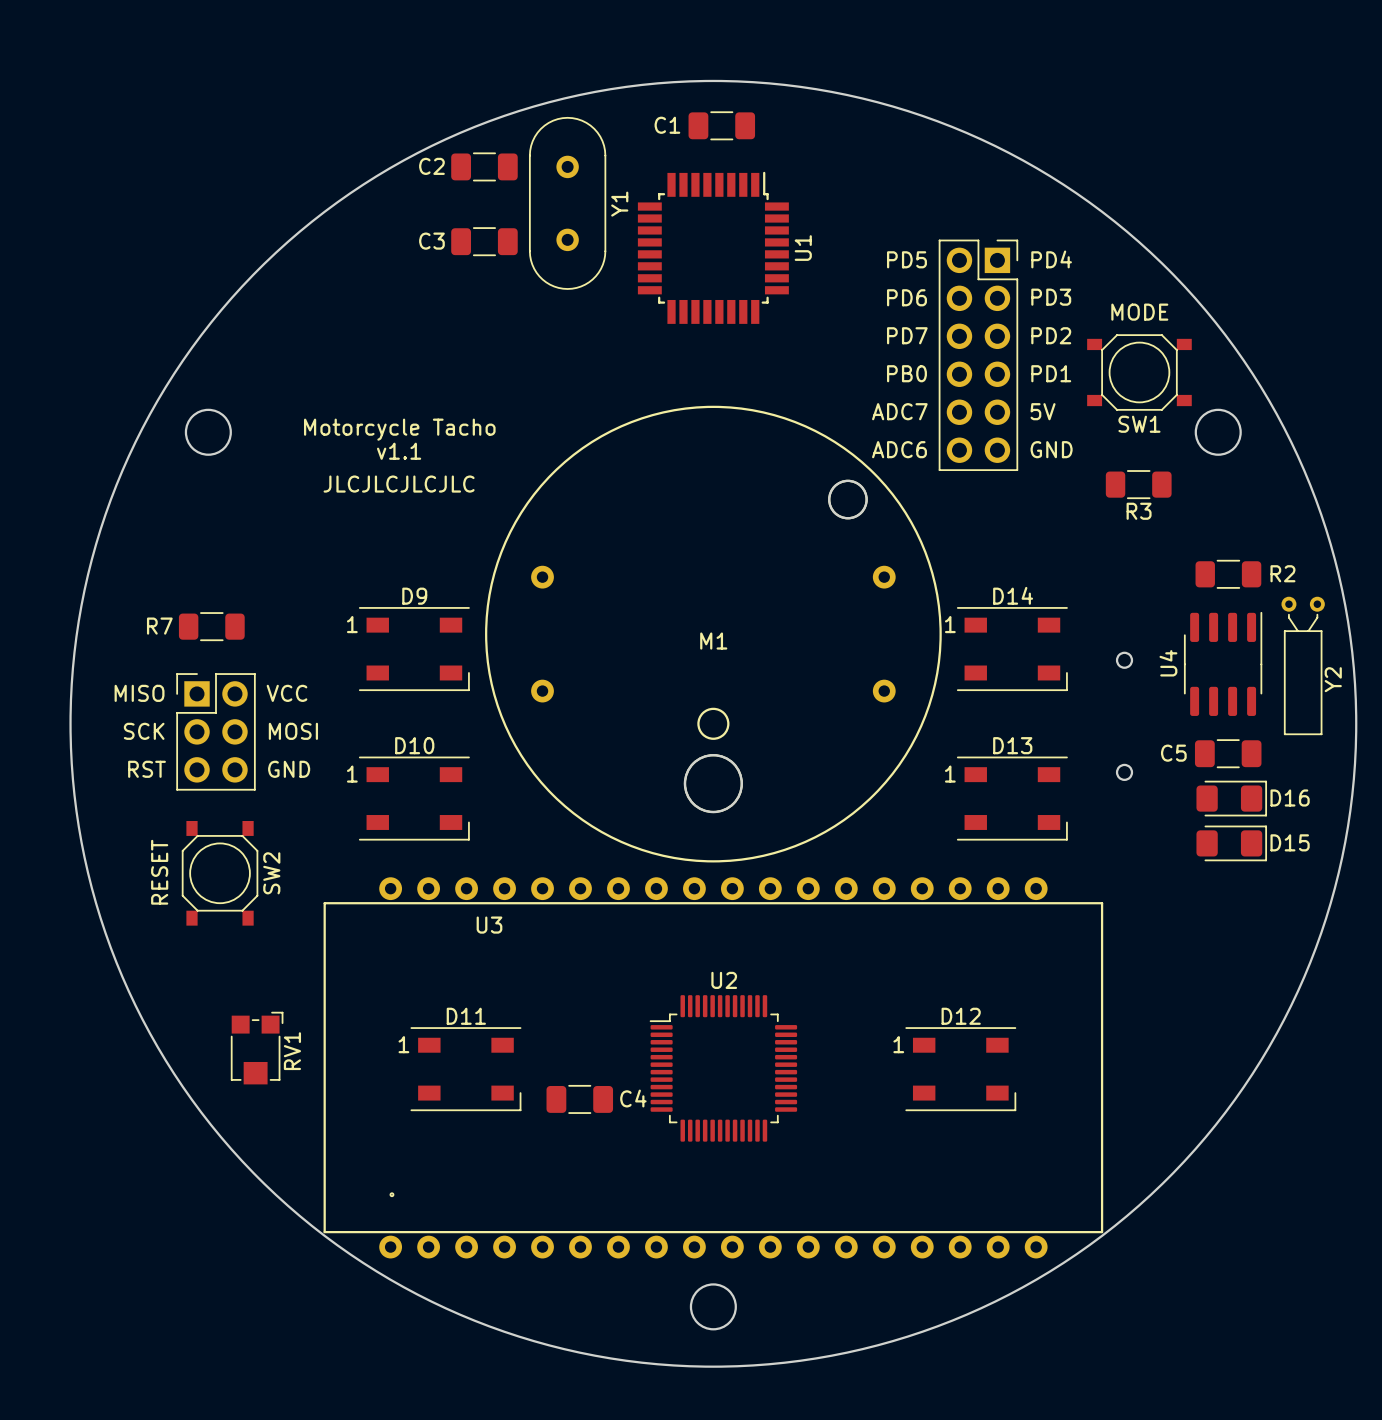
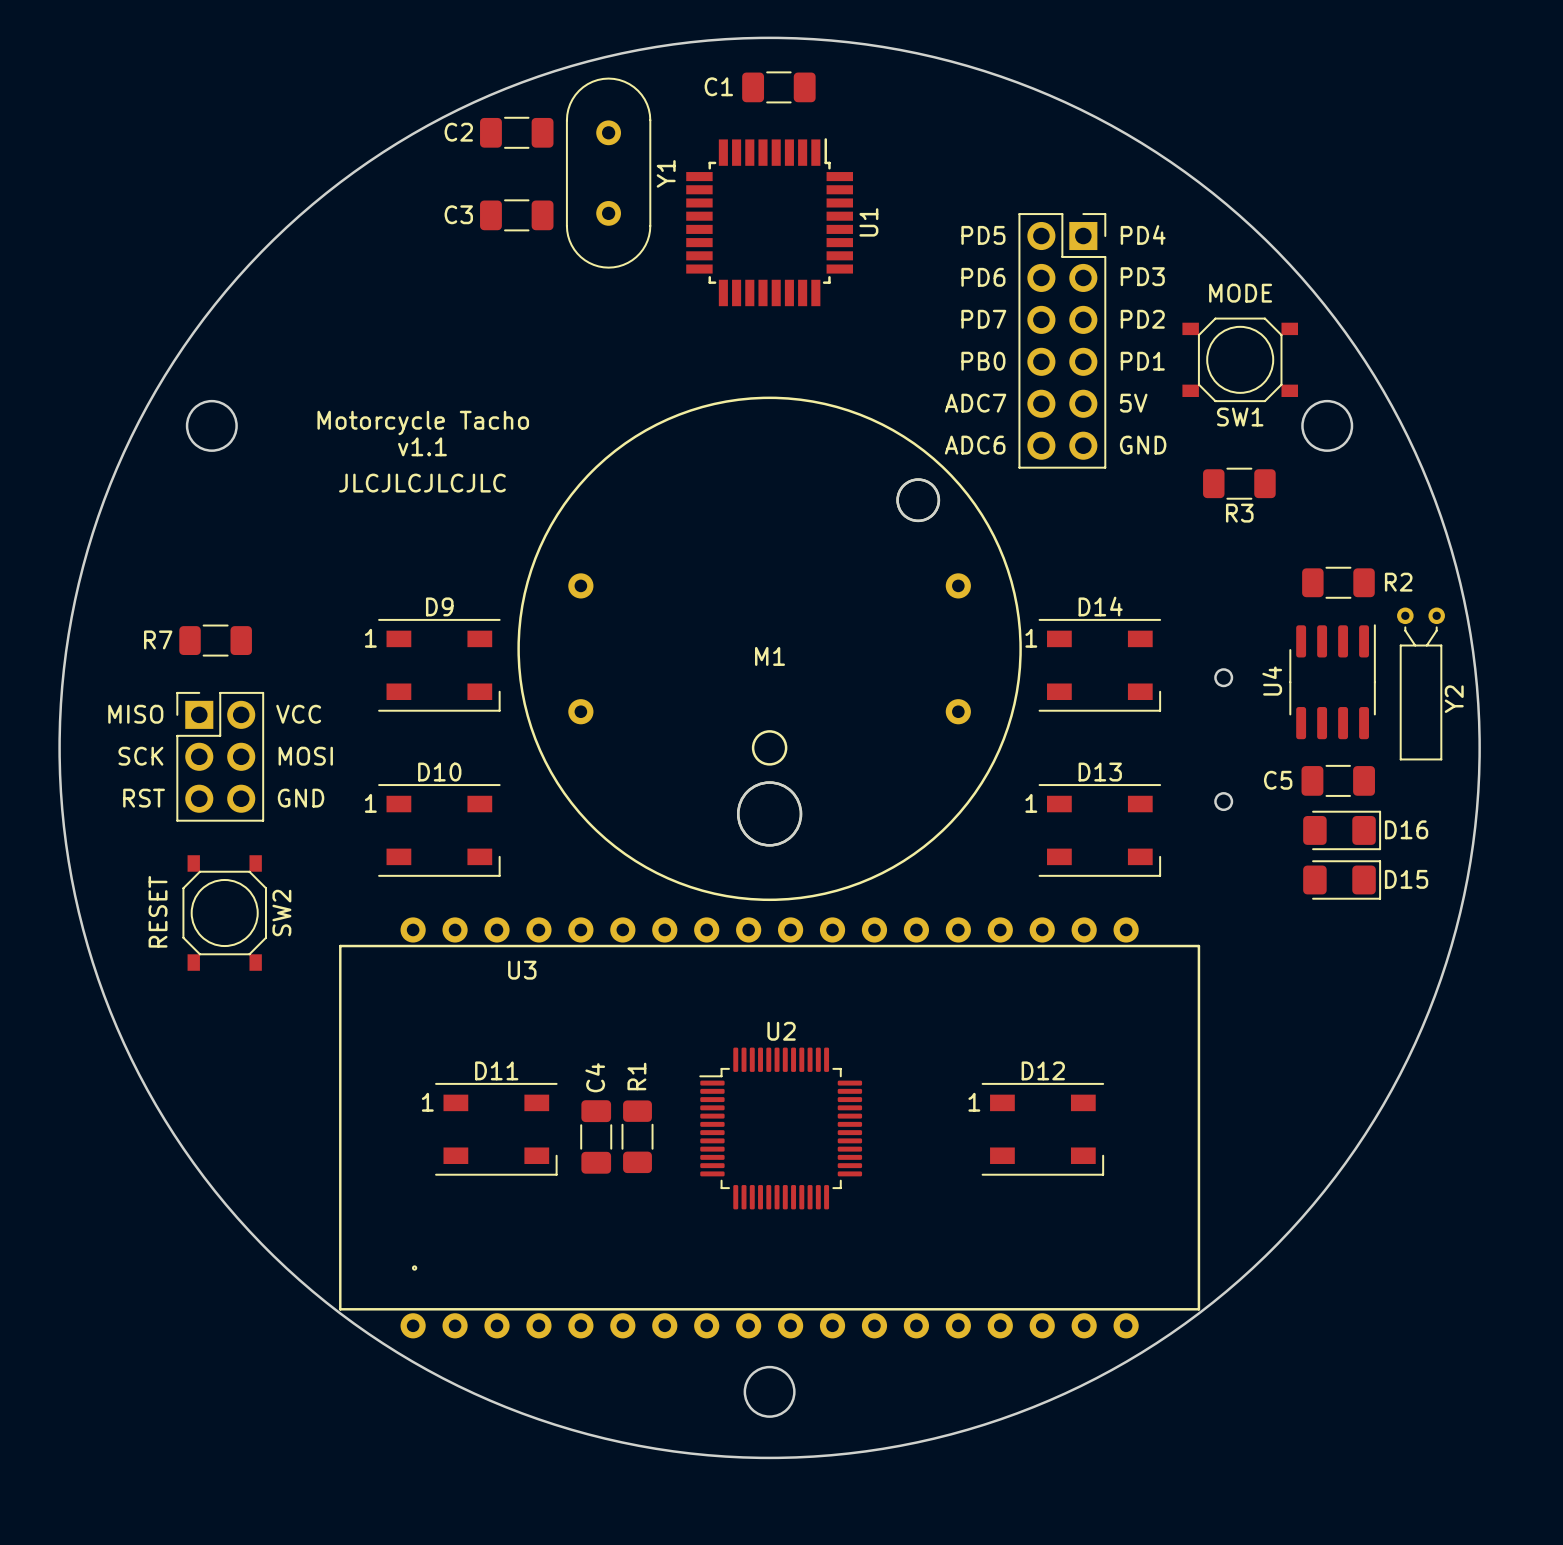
RV1: (257, 1048) -> none
R1: none -> (637, 1136)
C4 name position: C4 (633, 1098) -> C4 (595, 1077)
C4 rotation: 0° (579, 1099) -> 90° clockwise (596, 1136)

